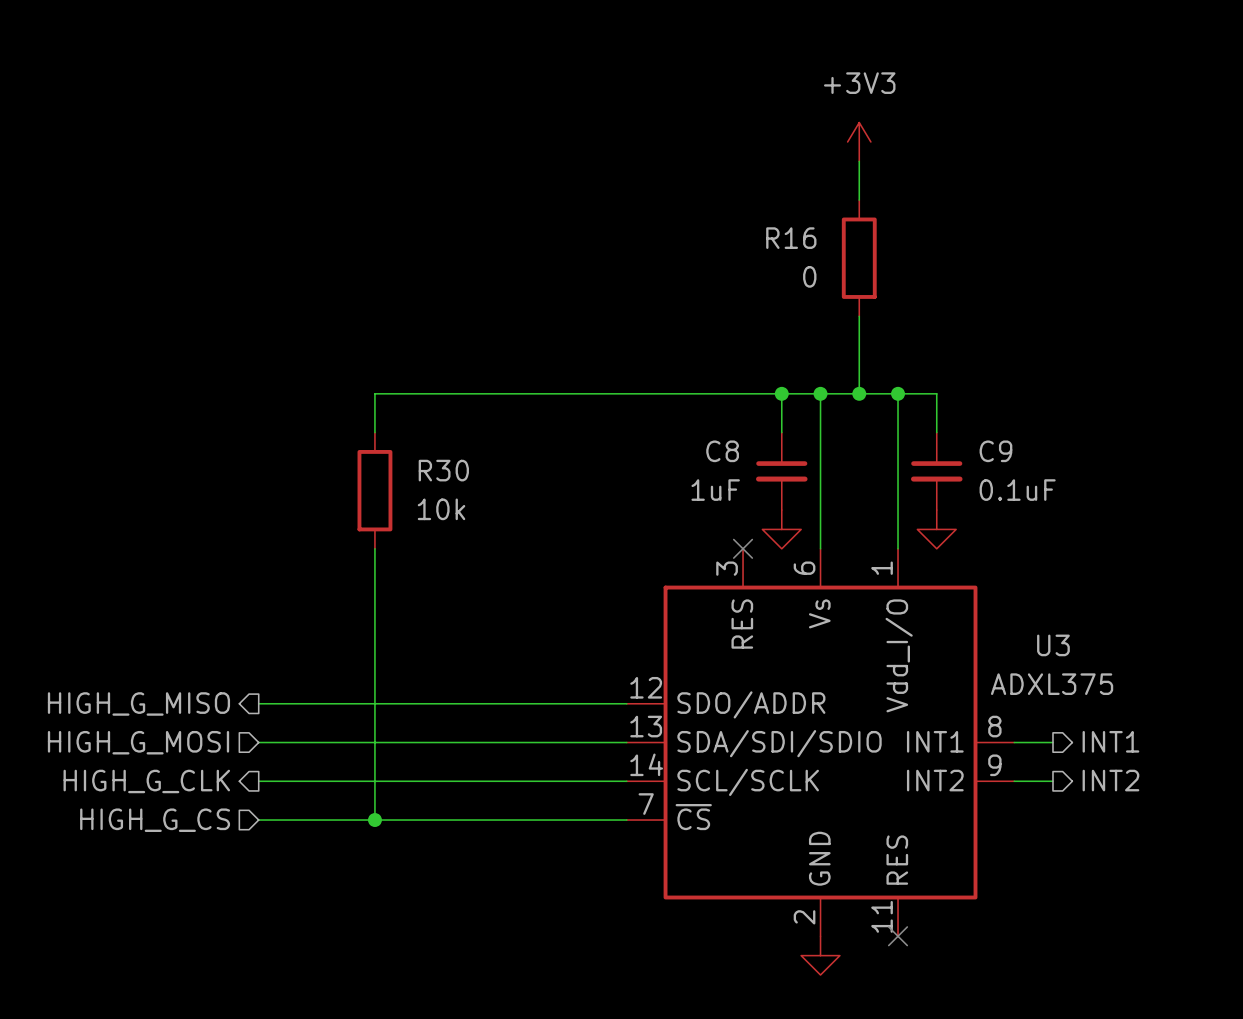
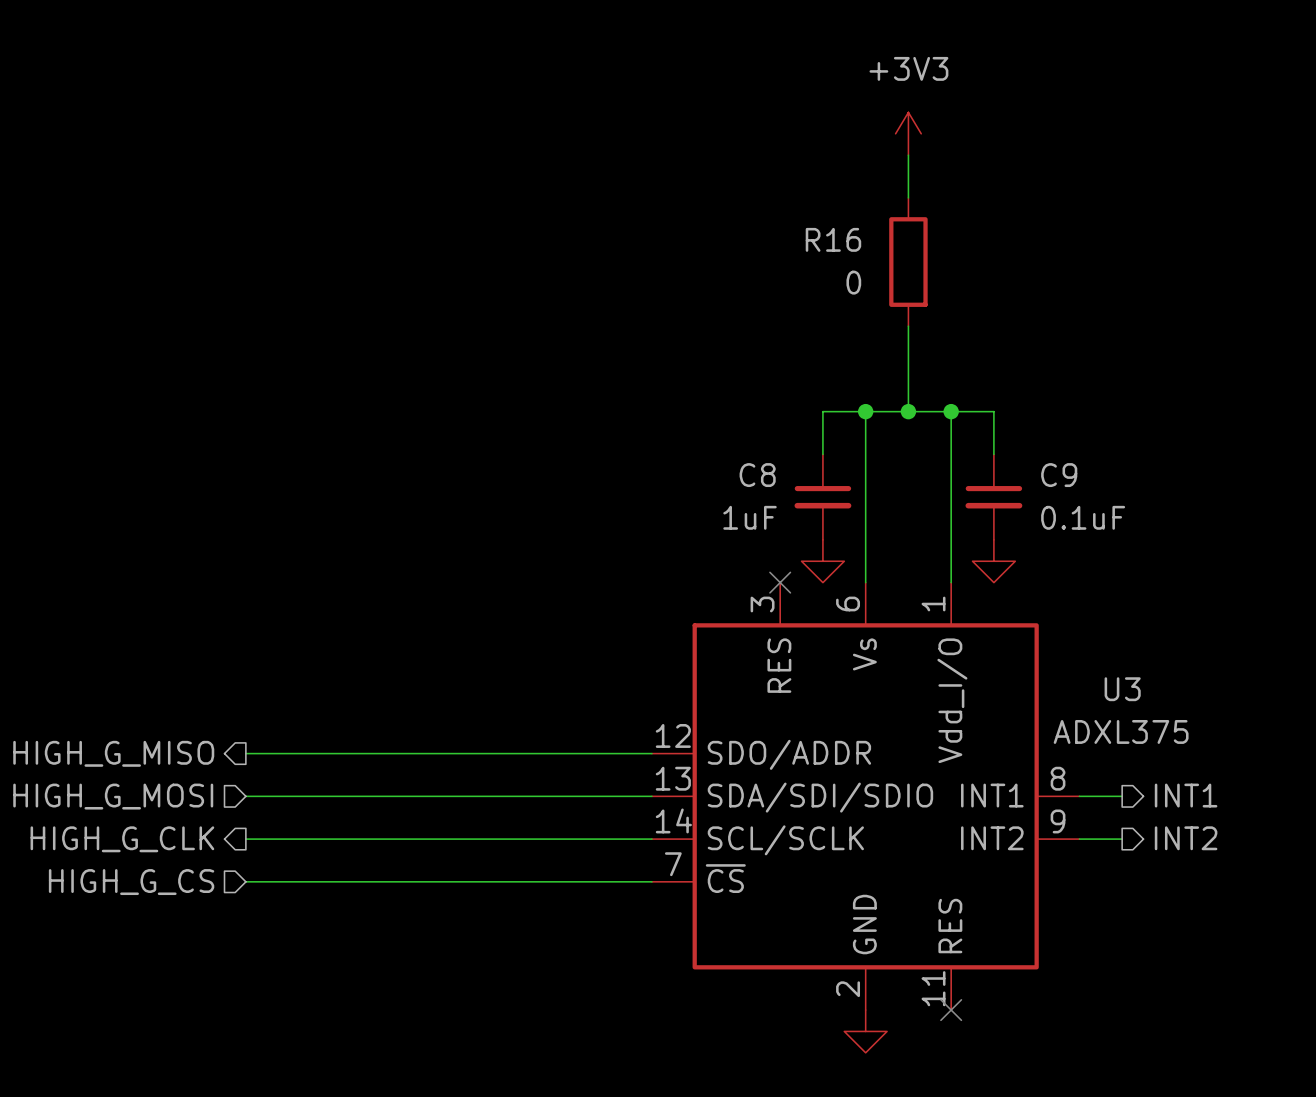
wire: (781, 393) (374, 393) (374, 432) -> none
junction: (781, 393) -> none
R30: 10k (374, 490) -> none
wire: (374, 548) (374, 820) -> none
junction: (374, 820) -> none

